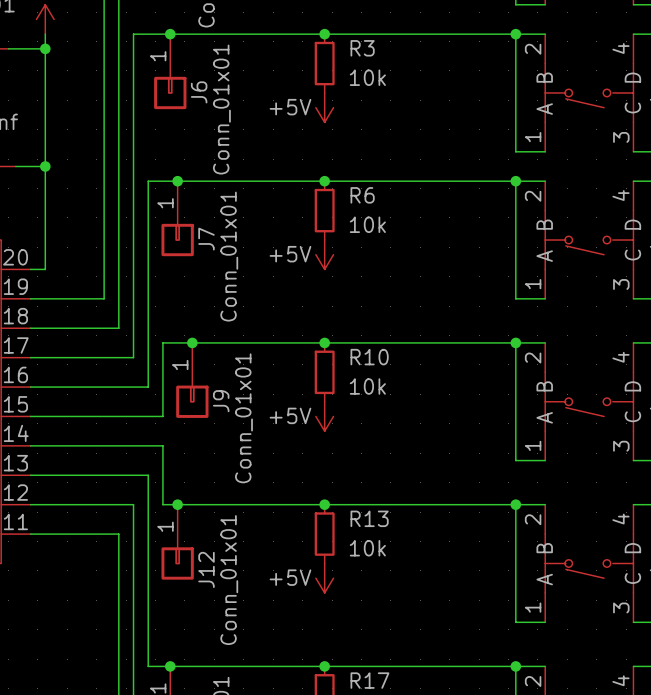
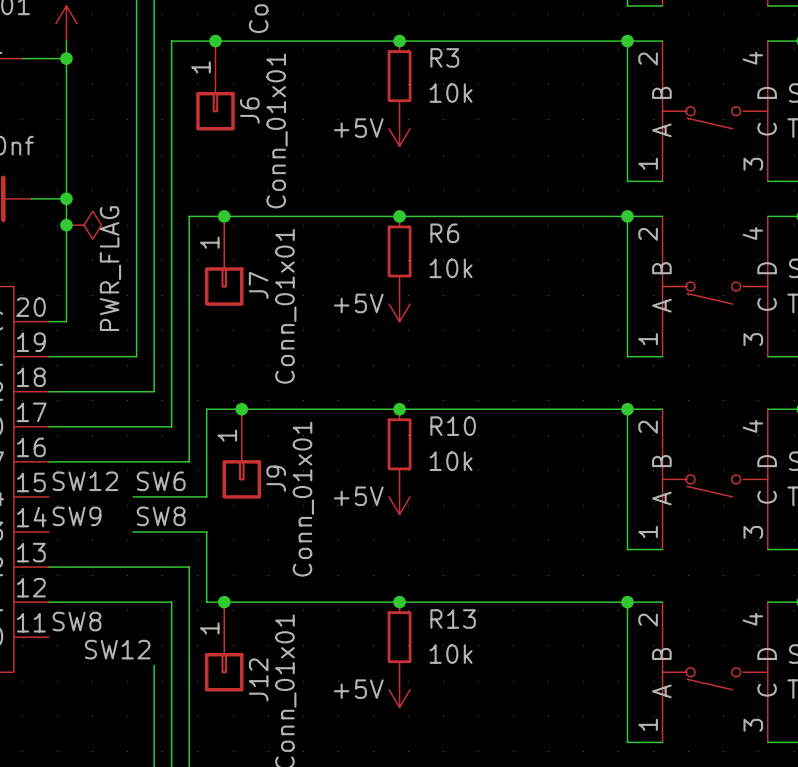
junction: none -> (66, 225)
power symbol: none -> PWR_FLAG (83, 225)
label: none -> SW12 (85, 481)
label: none -> SW6 (161, 481)
wire: (30, 416) (101, 416) -> none
label: none -> SW9 (77, 516)
label: none -> SW8 (161, 516)
wire: (30, 445) (101, 445) -> none
label: none -> SW8 (77, 621)
wire: (30, 534) (118, 534) (118, 557) -> none
label: none -> SW12 (117, 649)

